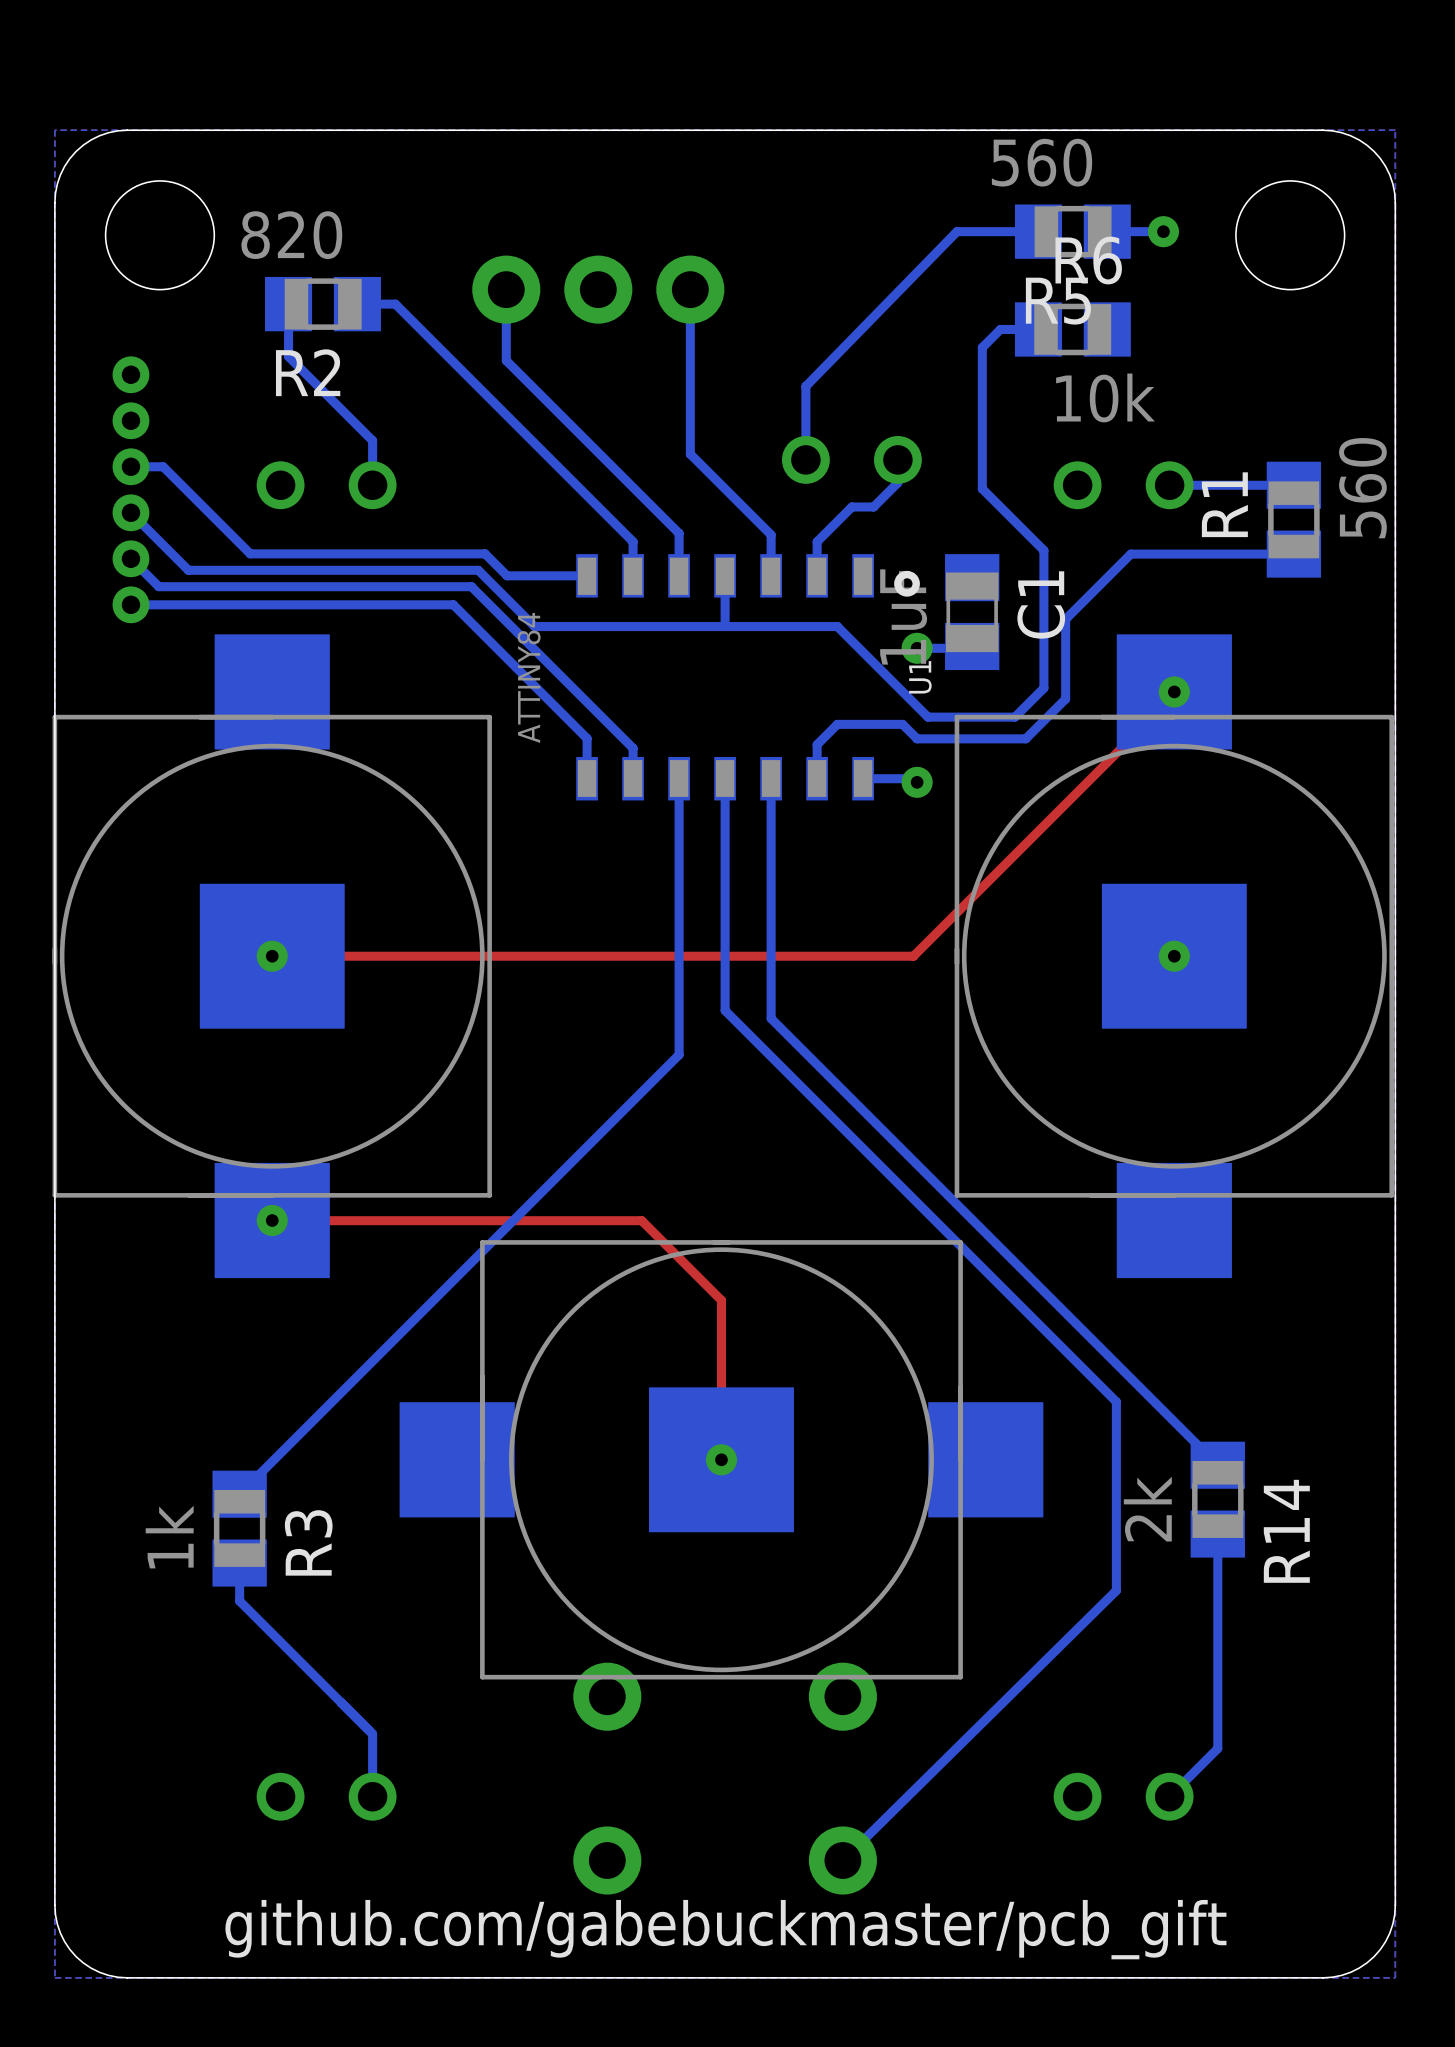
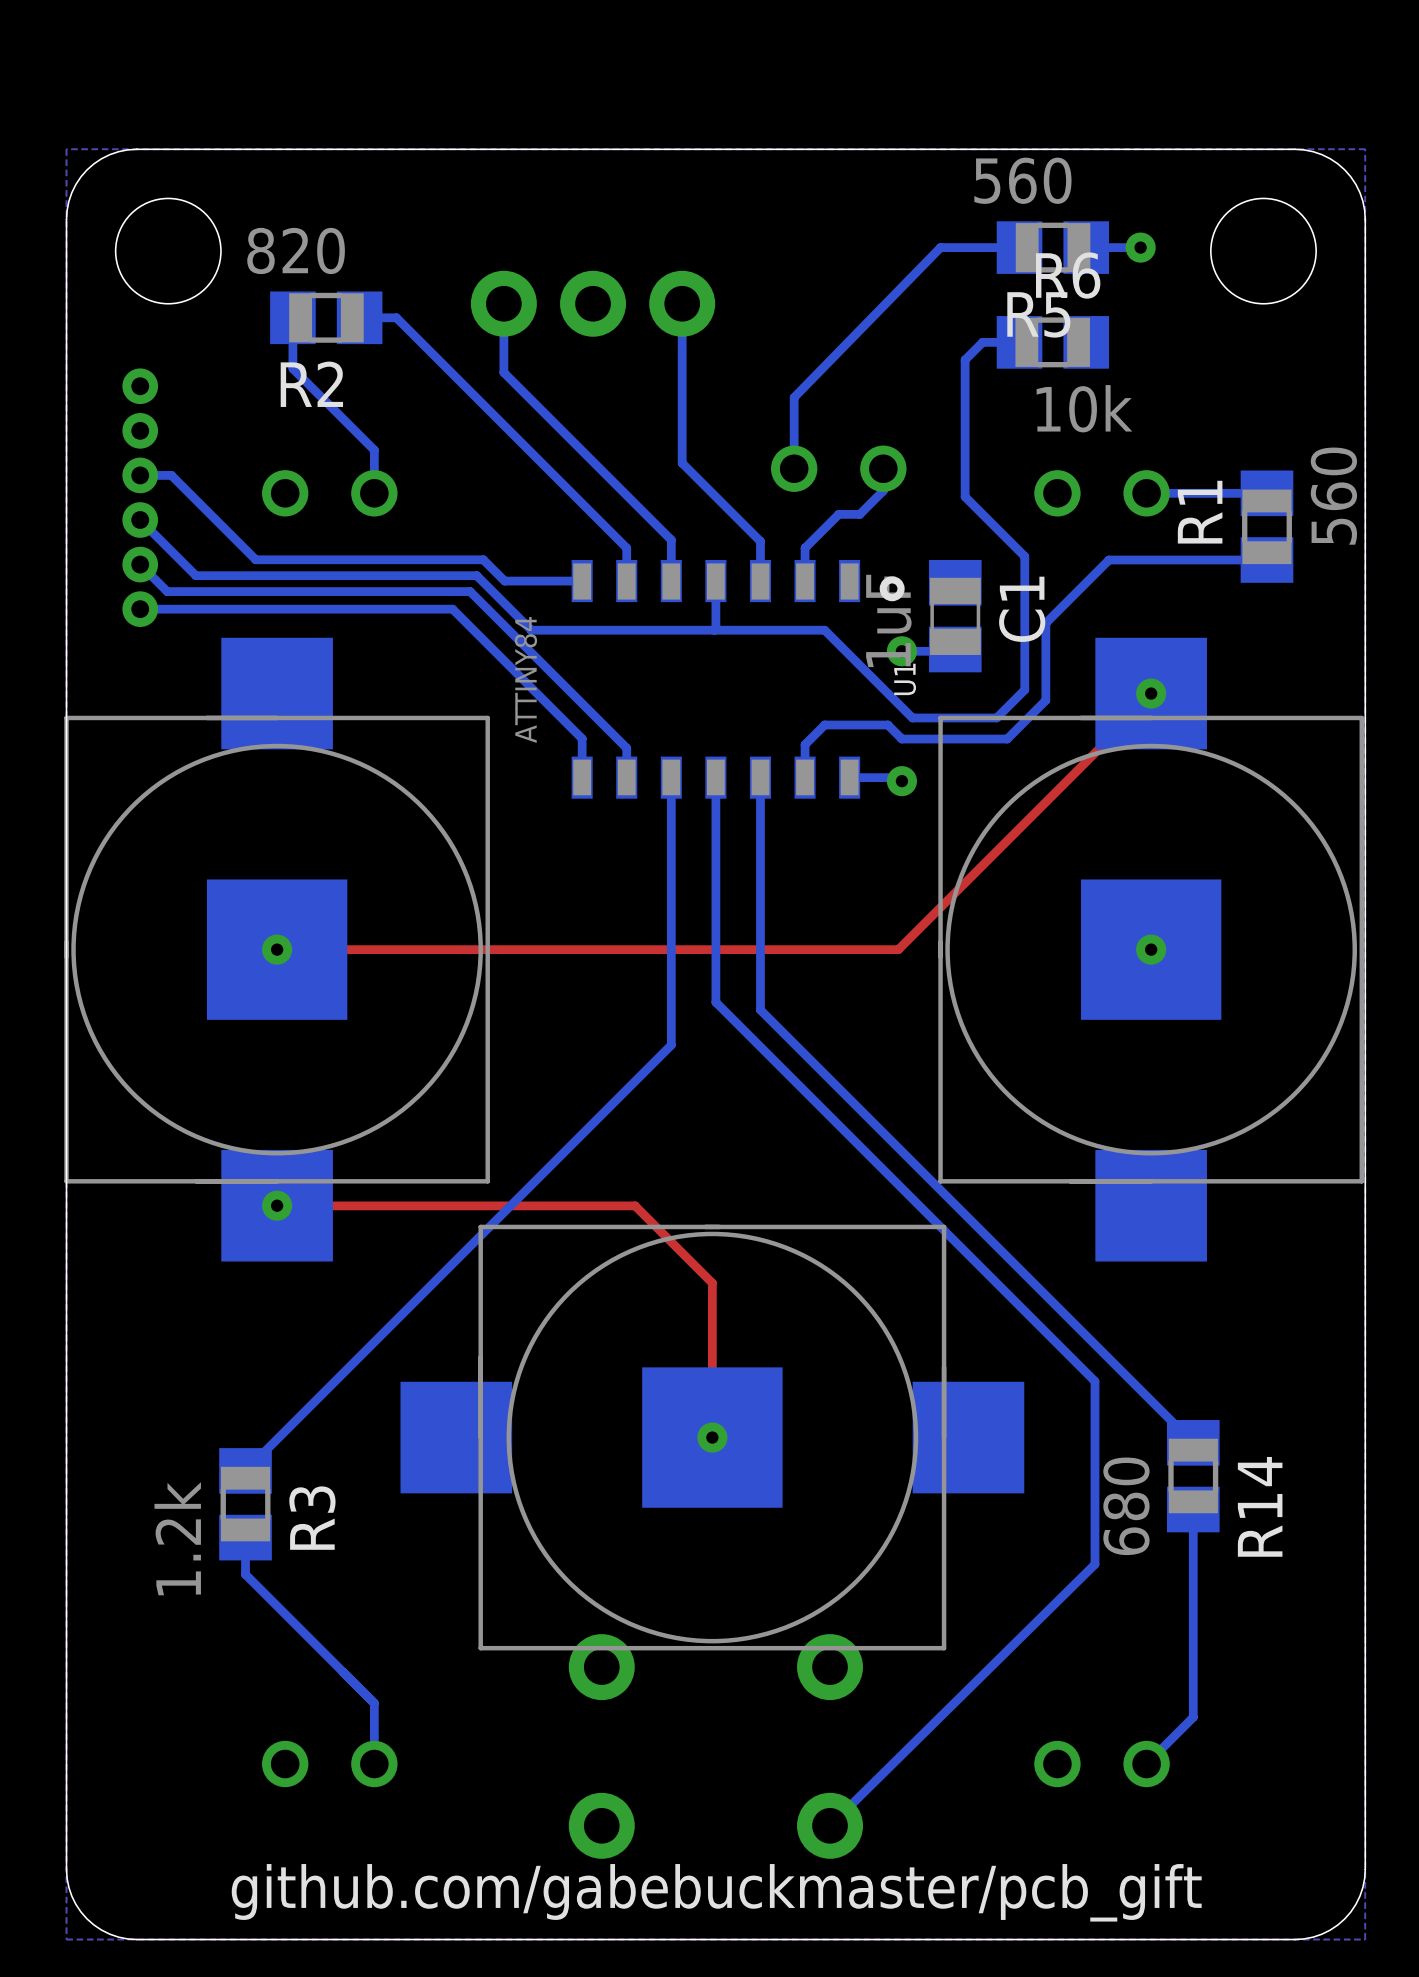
R14 value: 2k (1147, 1509) -> 680 (1126, 1506)
R3 value: 1k (169, 1537) -> 1.2k (177, 1538)

